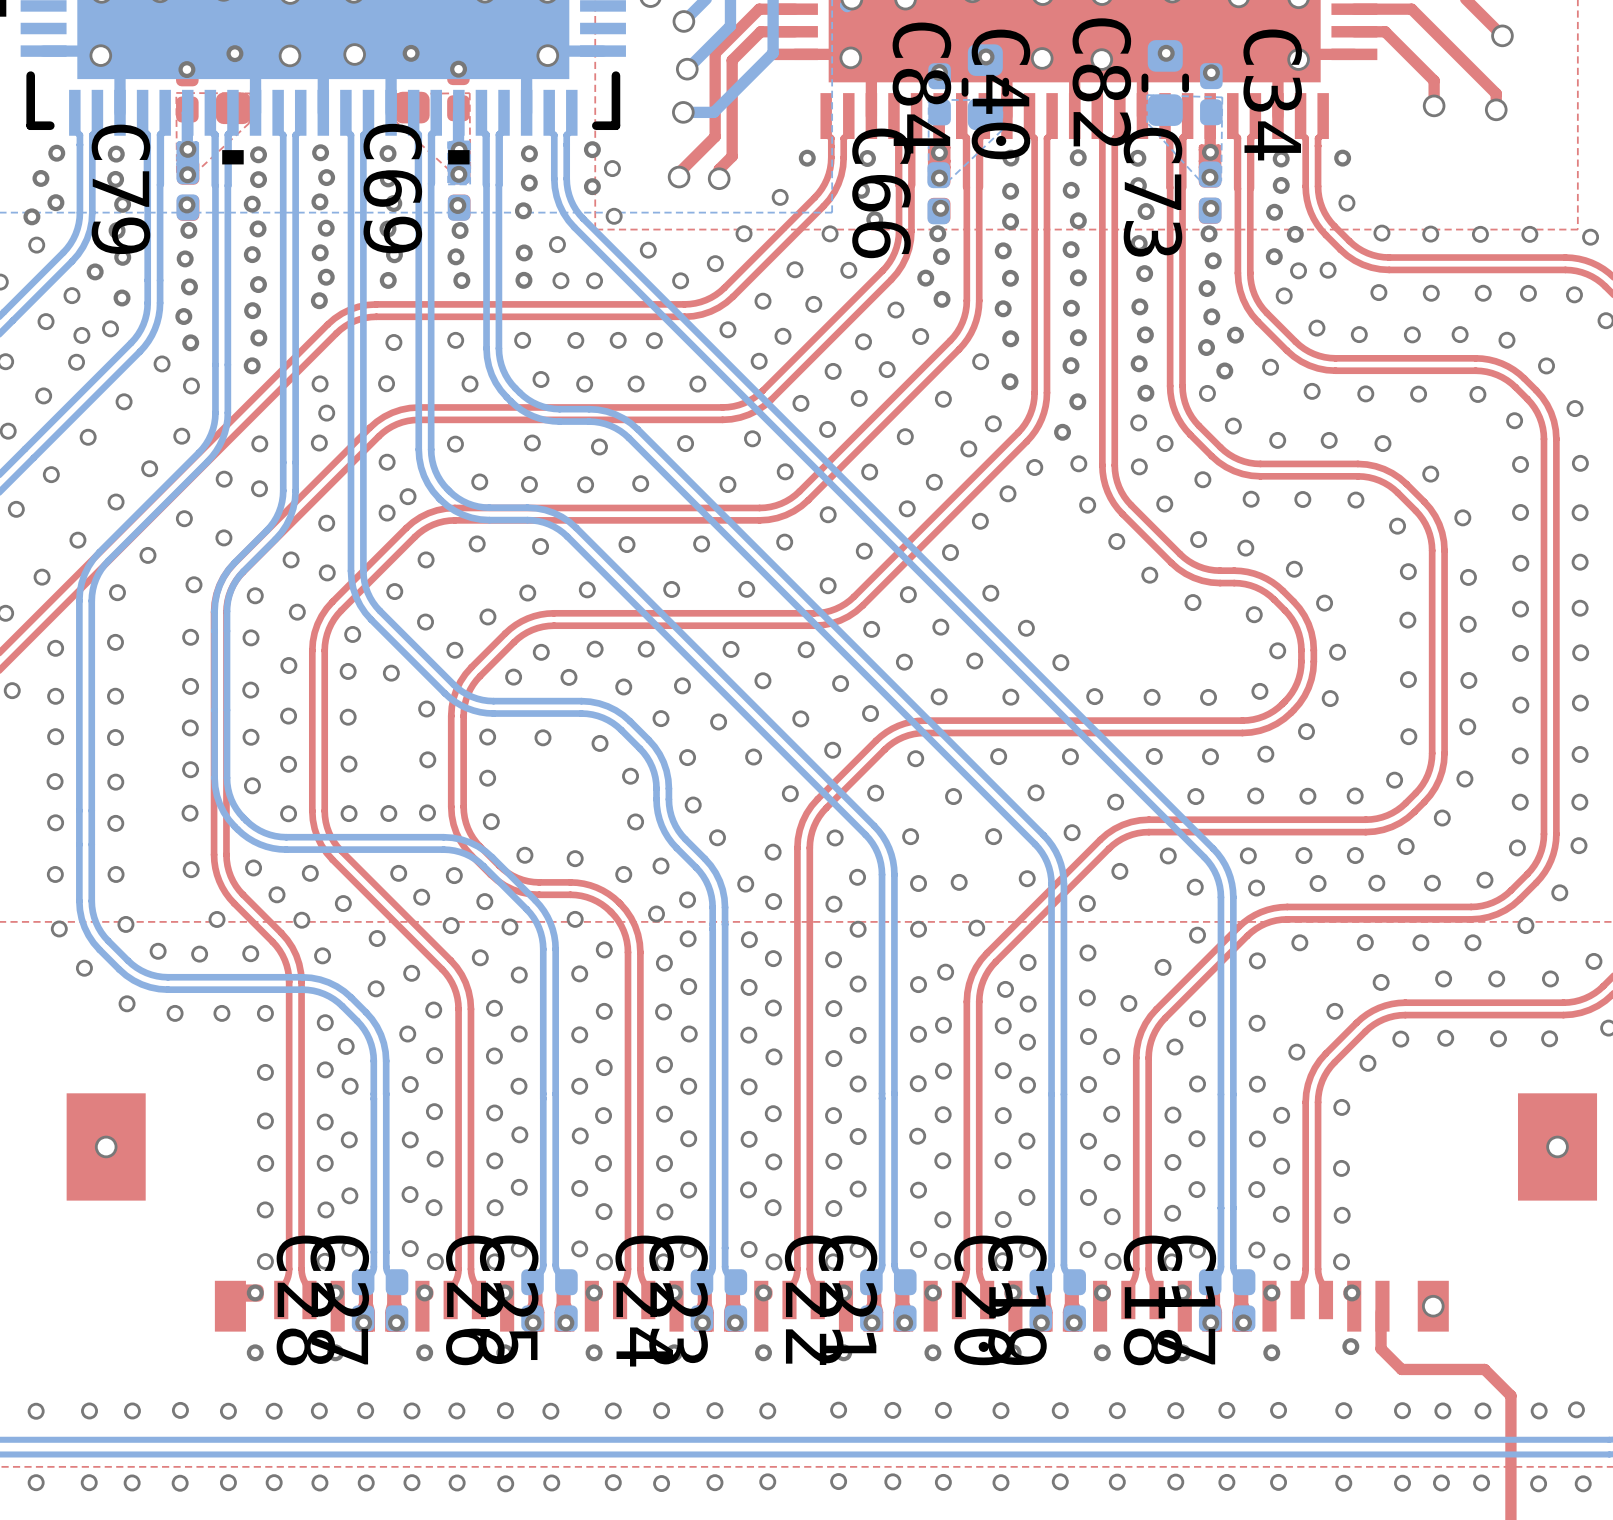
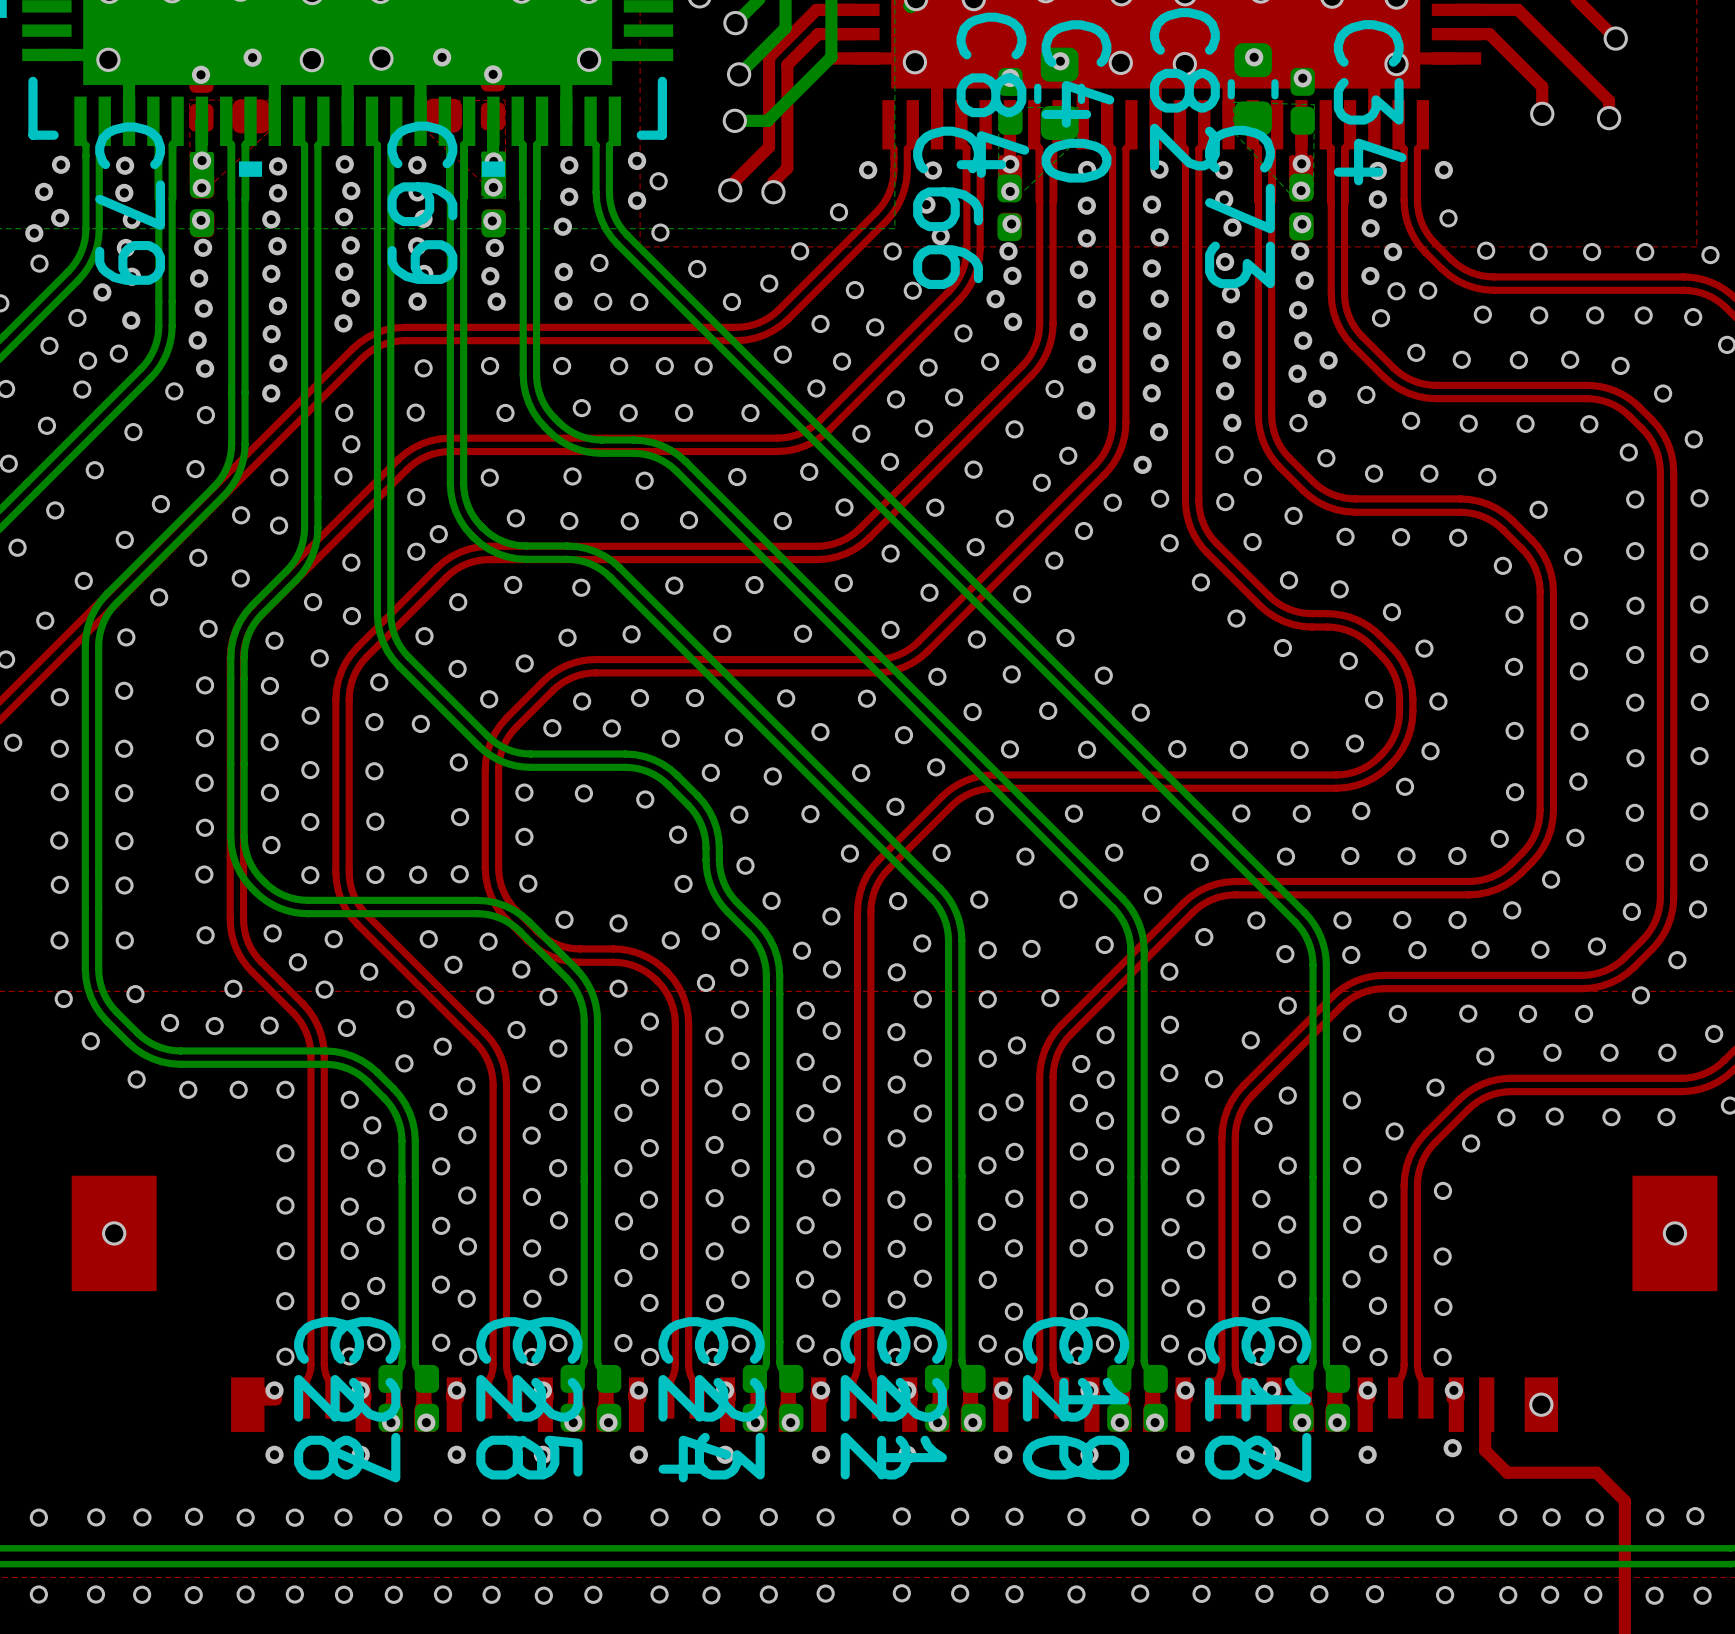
part footprint: [66, 1093, 1598, 1332] -> [71, 1175, 1718, 1433]

